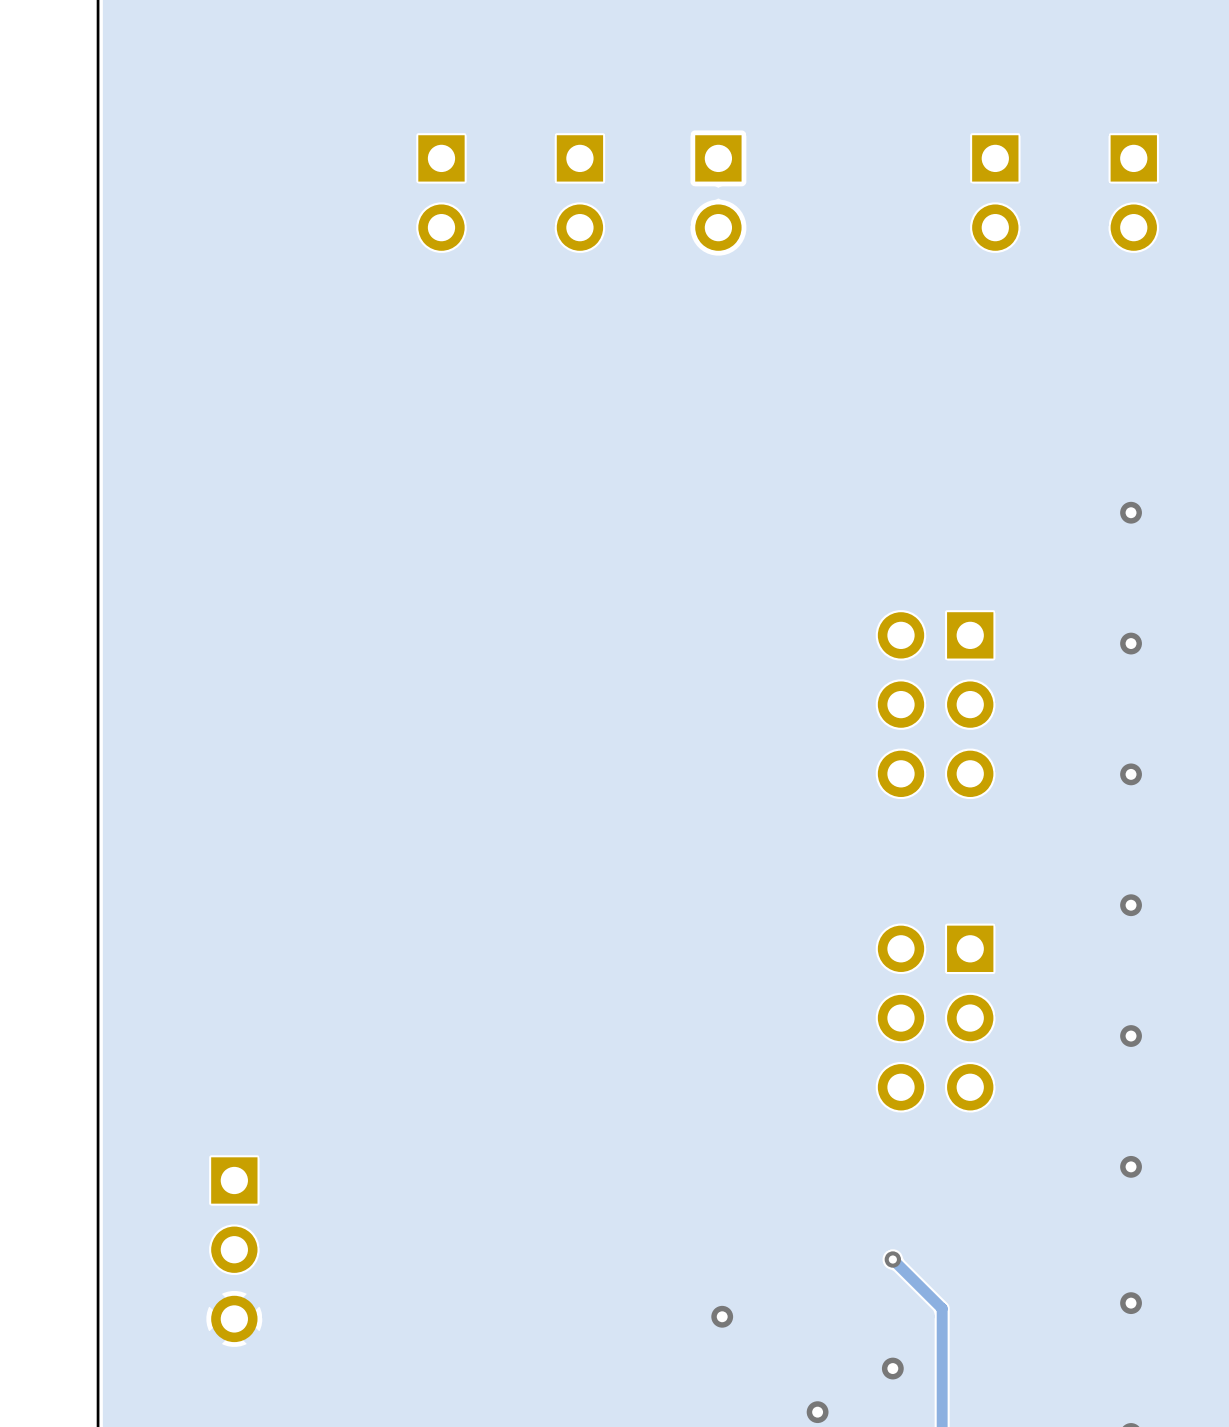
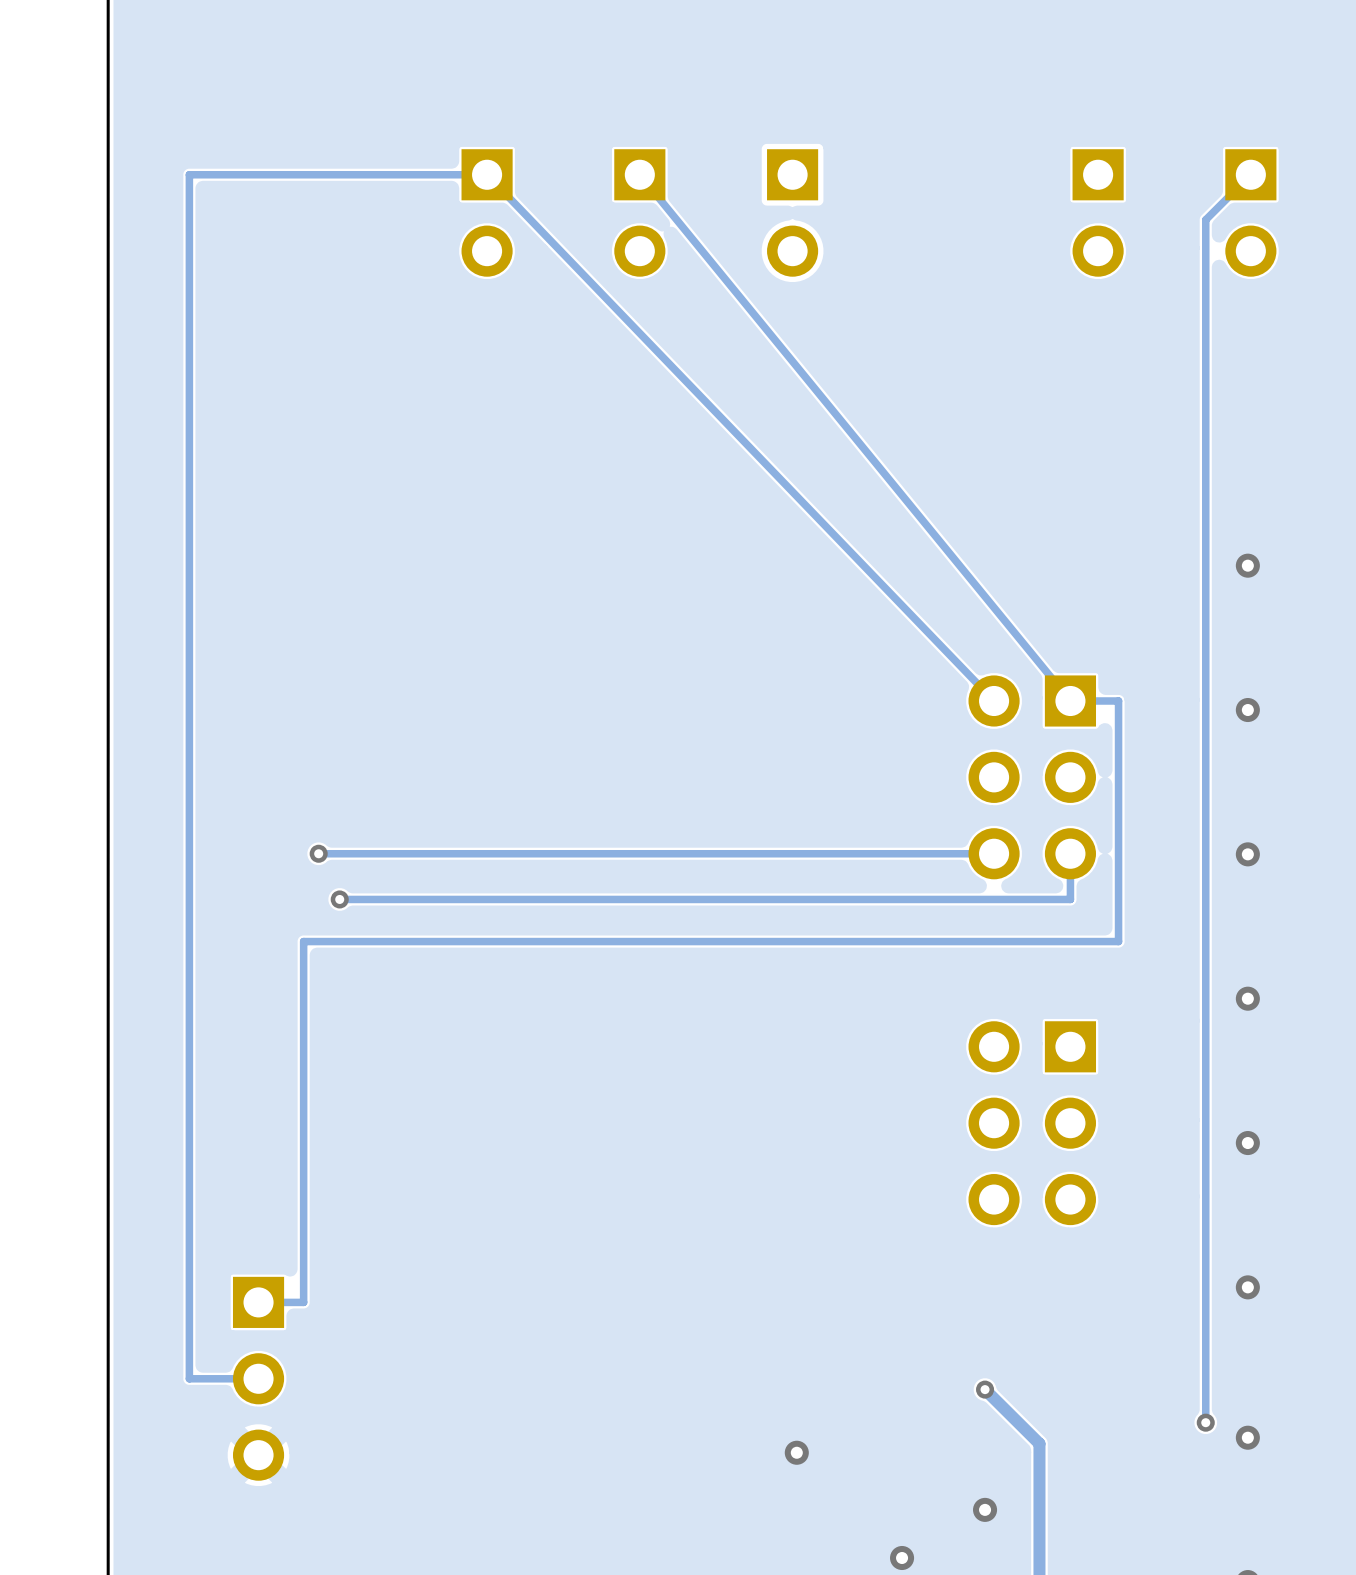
track: none -> (639, 174) (1070, 700) (1118, 700) (1118, 941) (303, 941) (303, 1302) (258, 1302)
track: none -> (1250, 174) (1205, 219) (1205, 1422)
track: none -> (994, 700) (487, 174) (189, 174) (189, 1378) (258, 1378)
via: none -> (318, 853)
track: none -> (994, 853) (318, 853)
track: none -> (1070, 853) (1070, 899) (339, 899)
via: none -> (339, 899)
via: none -> (1205, 1422)

